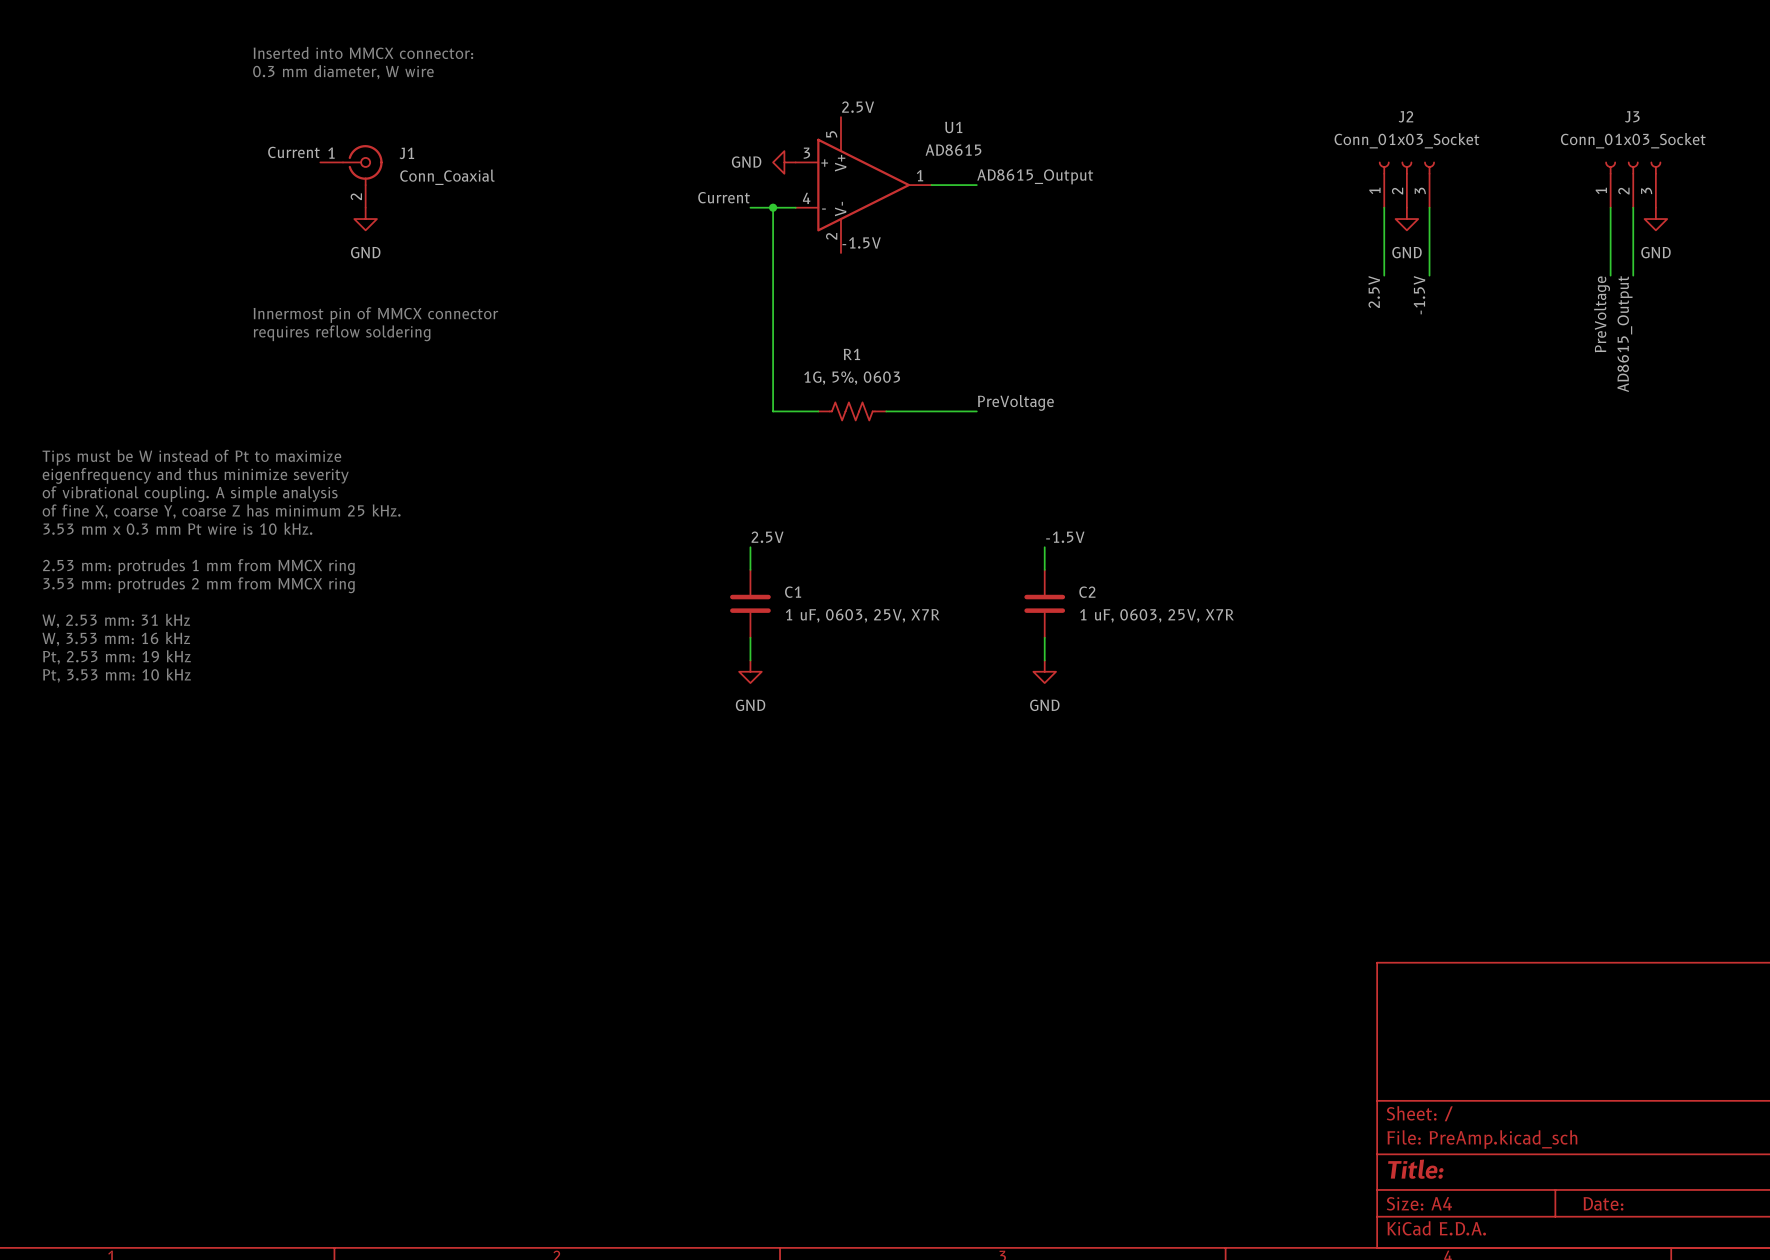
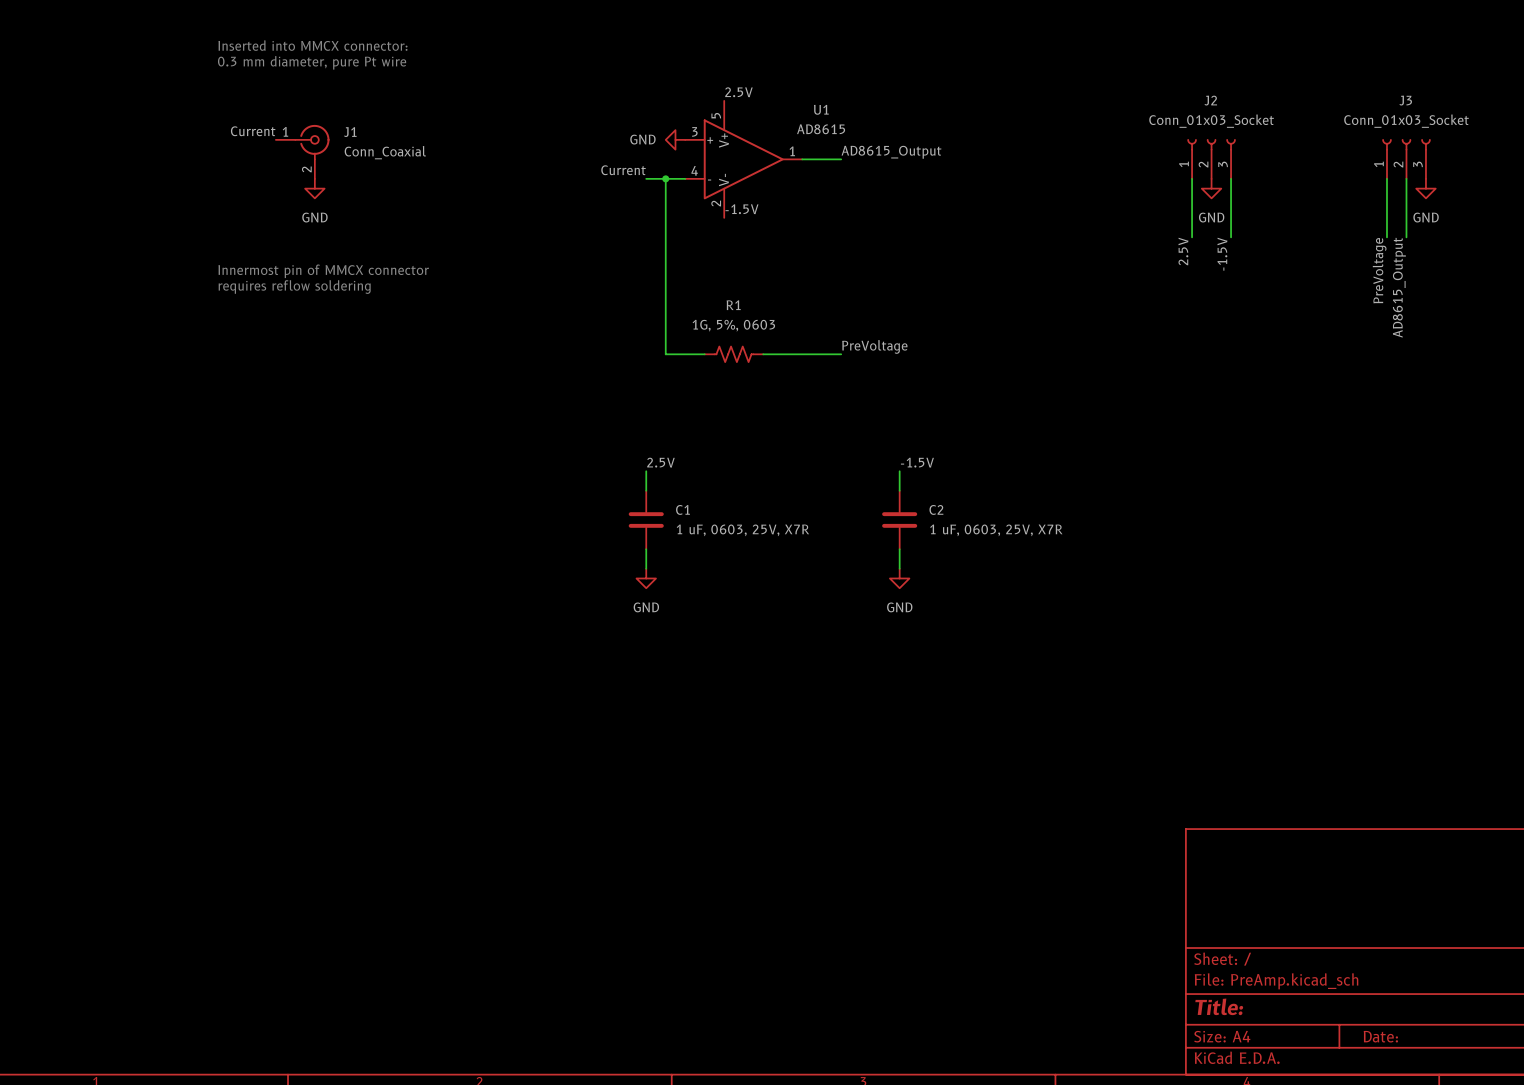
text: 0.3 mm diameter, W wire (343, 72) -> 0.3 mm diameter, pure Pt wire (312, 62)
text: Tips must be W instead of Pt to maximize (191, 457) -> none
text: eigenfrequency and thus minimize severity (195, 475) -> none
text: of vibrational coupling. A simple analysis (190, 494) -> none
text: of fine X, coarse Y, coarse Z has minimum 25 kHz. (221, 511) -> none
text: 3.53 mm x 0.3 mm Pt wire is 10 kHz. (177, 528) -> none
text: 2.53 mm: protrudes 1 mm from MMCX ring (198, 567) -> none
text: 3.53 mm: protrudes 2 mm from MMCX ring (199, 585) -> none
text: W, 2.53 mm: 31 kHz (116, 620) -> none
text: W, 3.53 mm: 16 kHz (116, 639) -> none
text: Pt, 2.53 mm: 19 kHz (116, 657) -> none
text: Pt, 3.53 mm: 10 kHz (116, 675) -> none

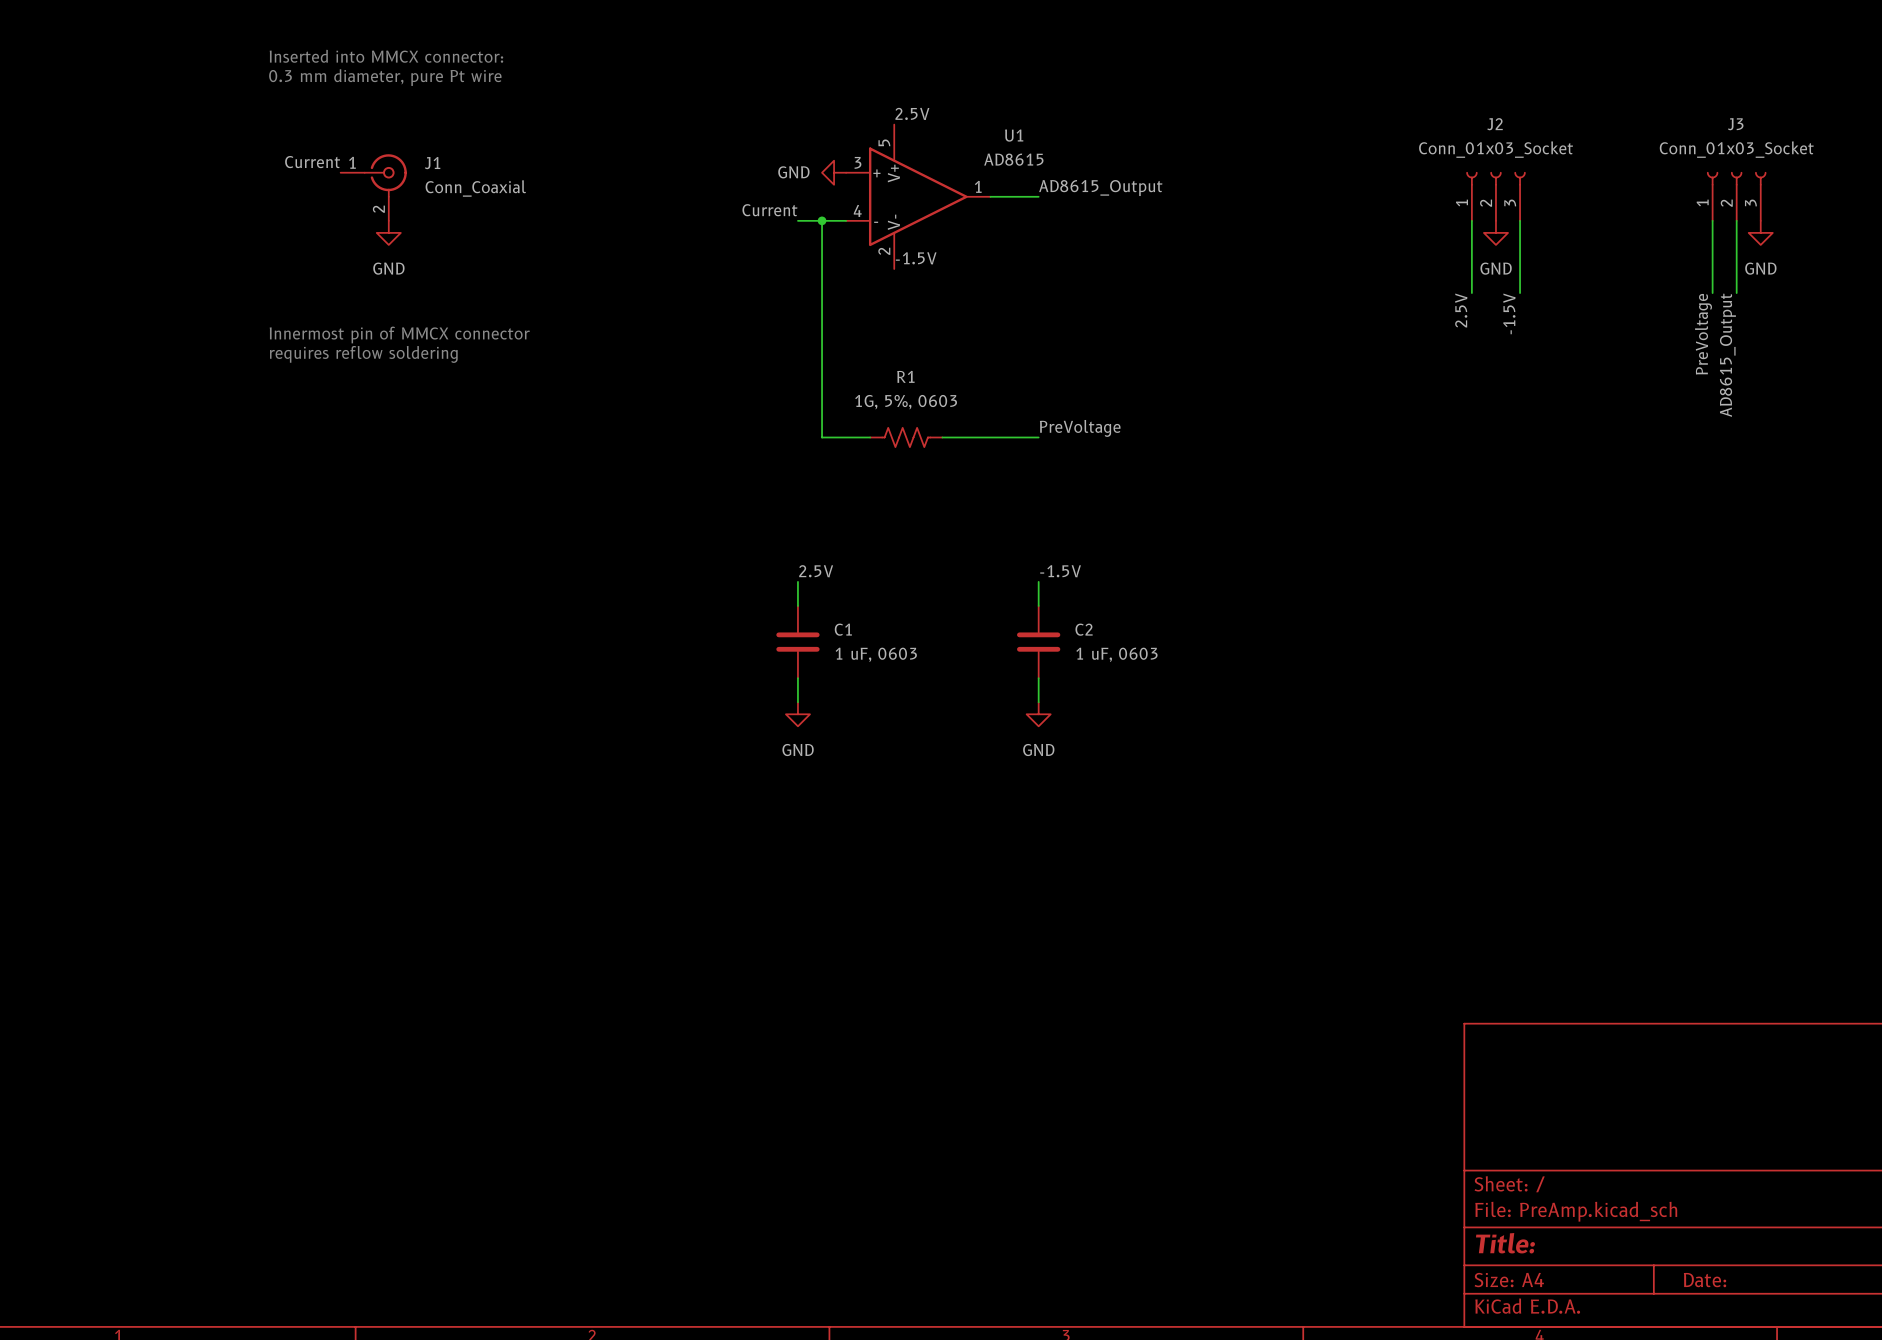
label position: -1.5V (917, 462) -> -1.5V (1060, 571)
wire: (899, 471) (899, 490) -> (1038, 581) (1038, 605)
C2 position: (899, 520) -> (1038, 642)
C1 value: 1 uF, 0603, 25V, X7R (742, 530) -> 1 uF, 0603 (876, 654)
C2 value: 1 uF, 0603, 25V, X7R (996, 530) -> 1 uF, 0603 (1116, 654)
wire: (899, 549) (899, 568) -> (1038, 678) (1038, 702)
power symbol position: GND (899, 578) -> GND (1038, 714)

